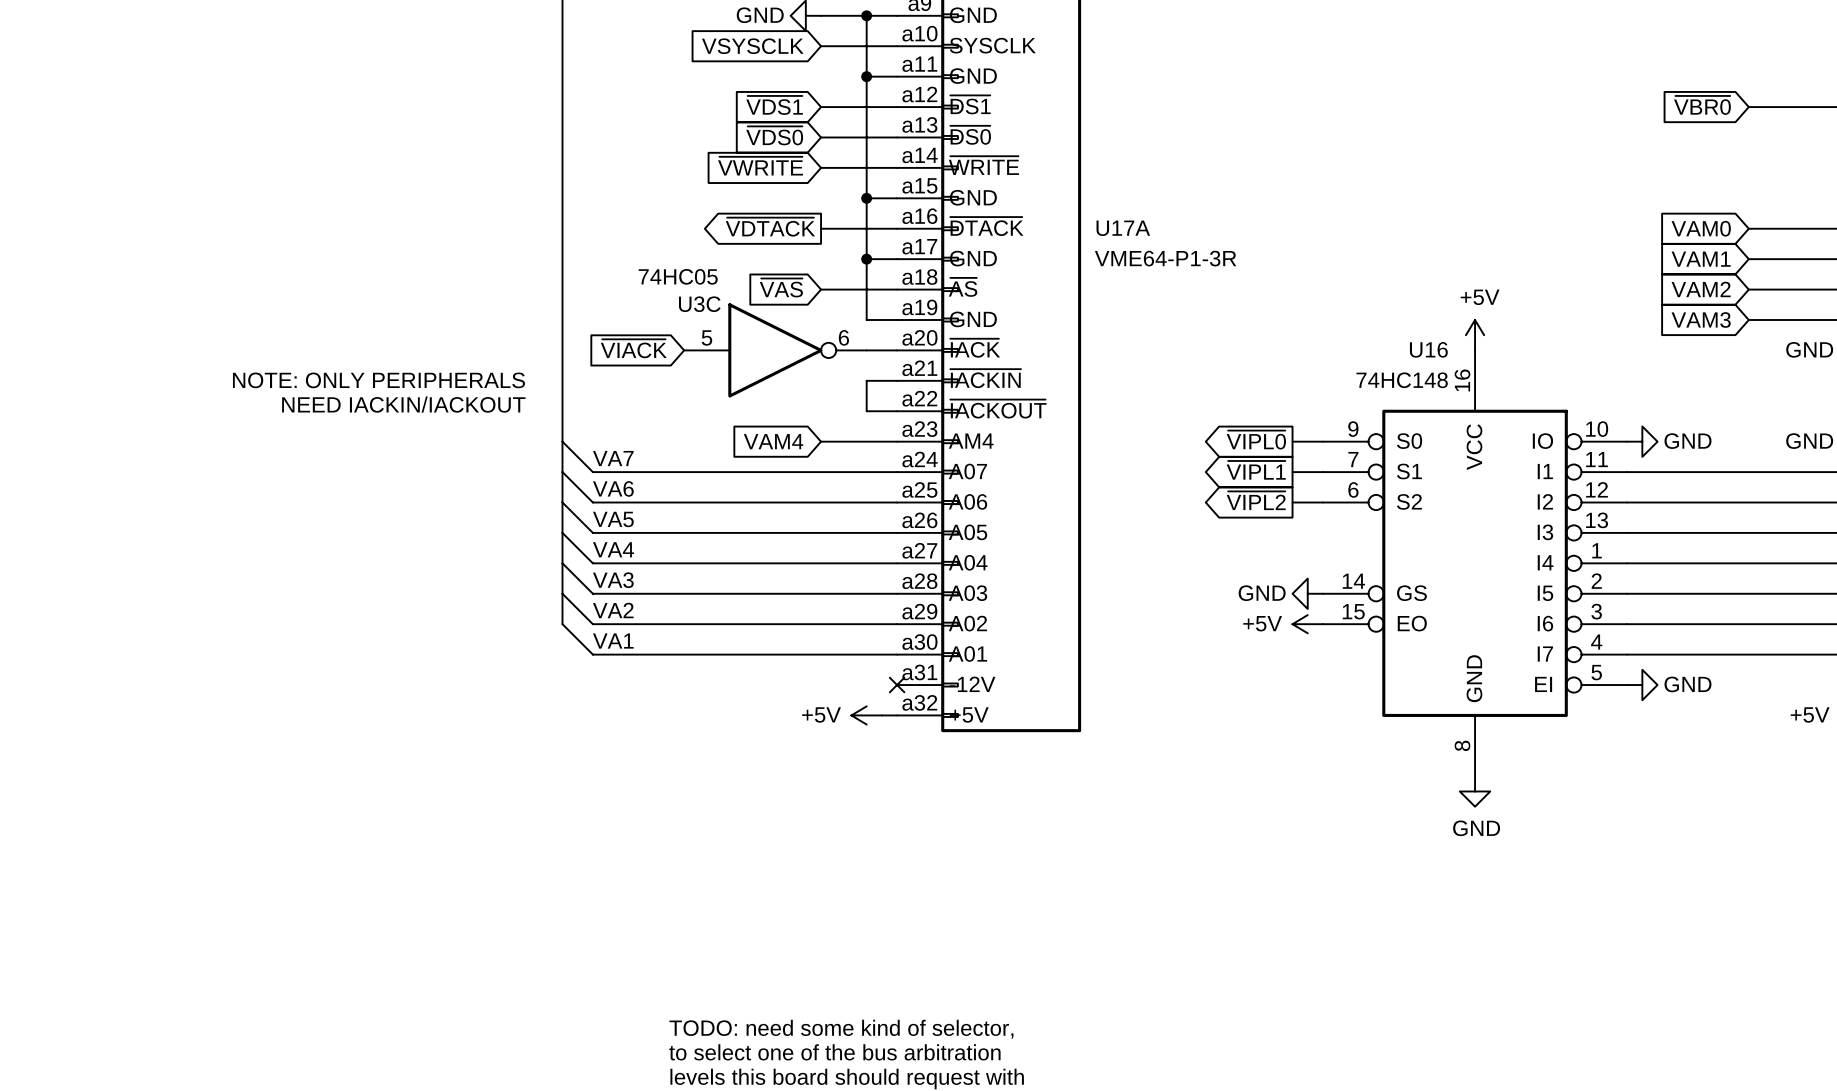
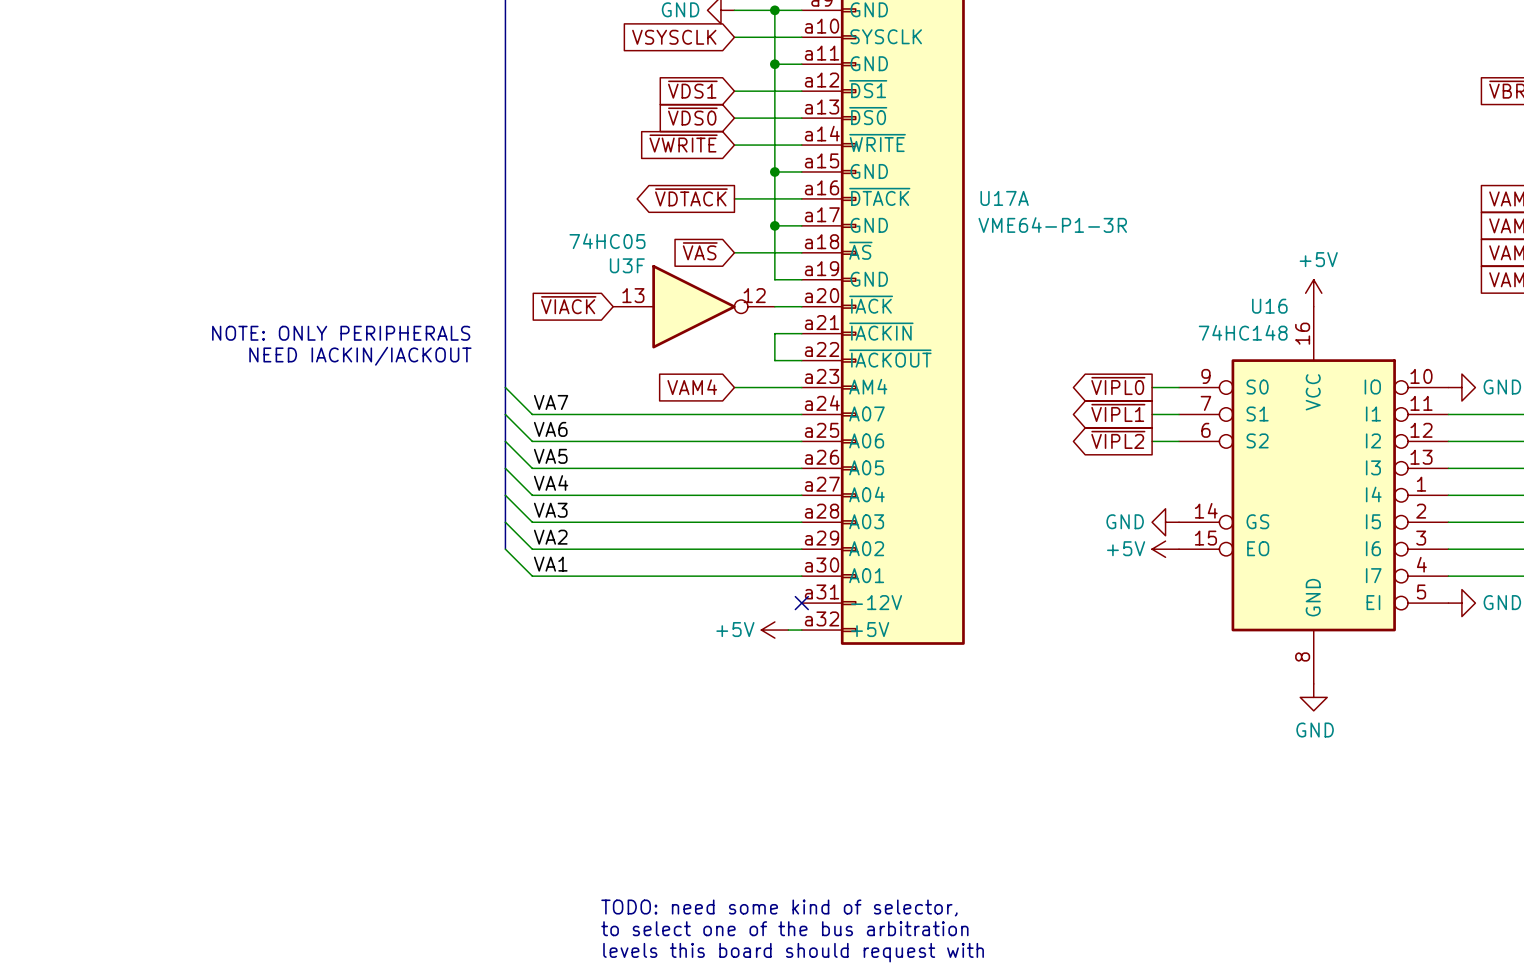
U3C name: U3C (699, 304) -> U3F (627, 265)
U3C pin number: 5 (706, 337) -> 13 (633, 295)
U3C pin number: 6 (843, 337) -> 12 (754, 295)

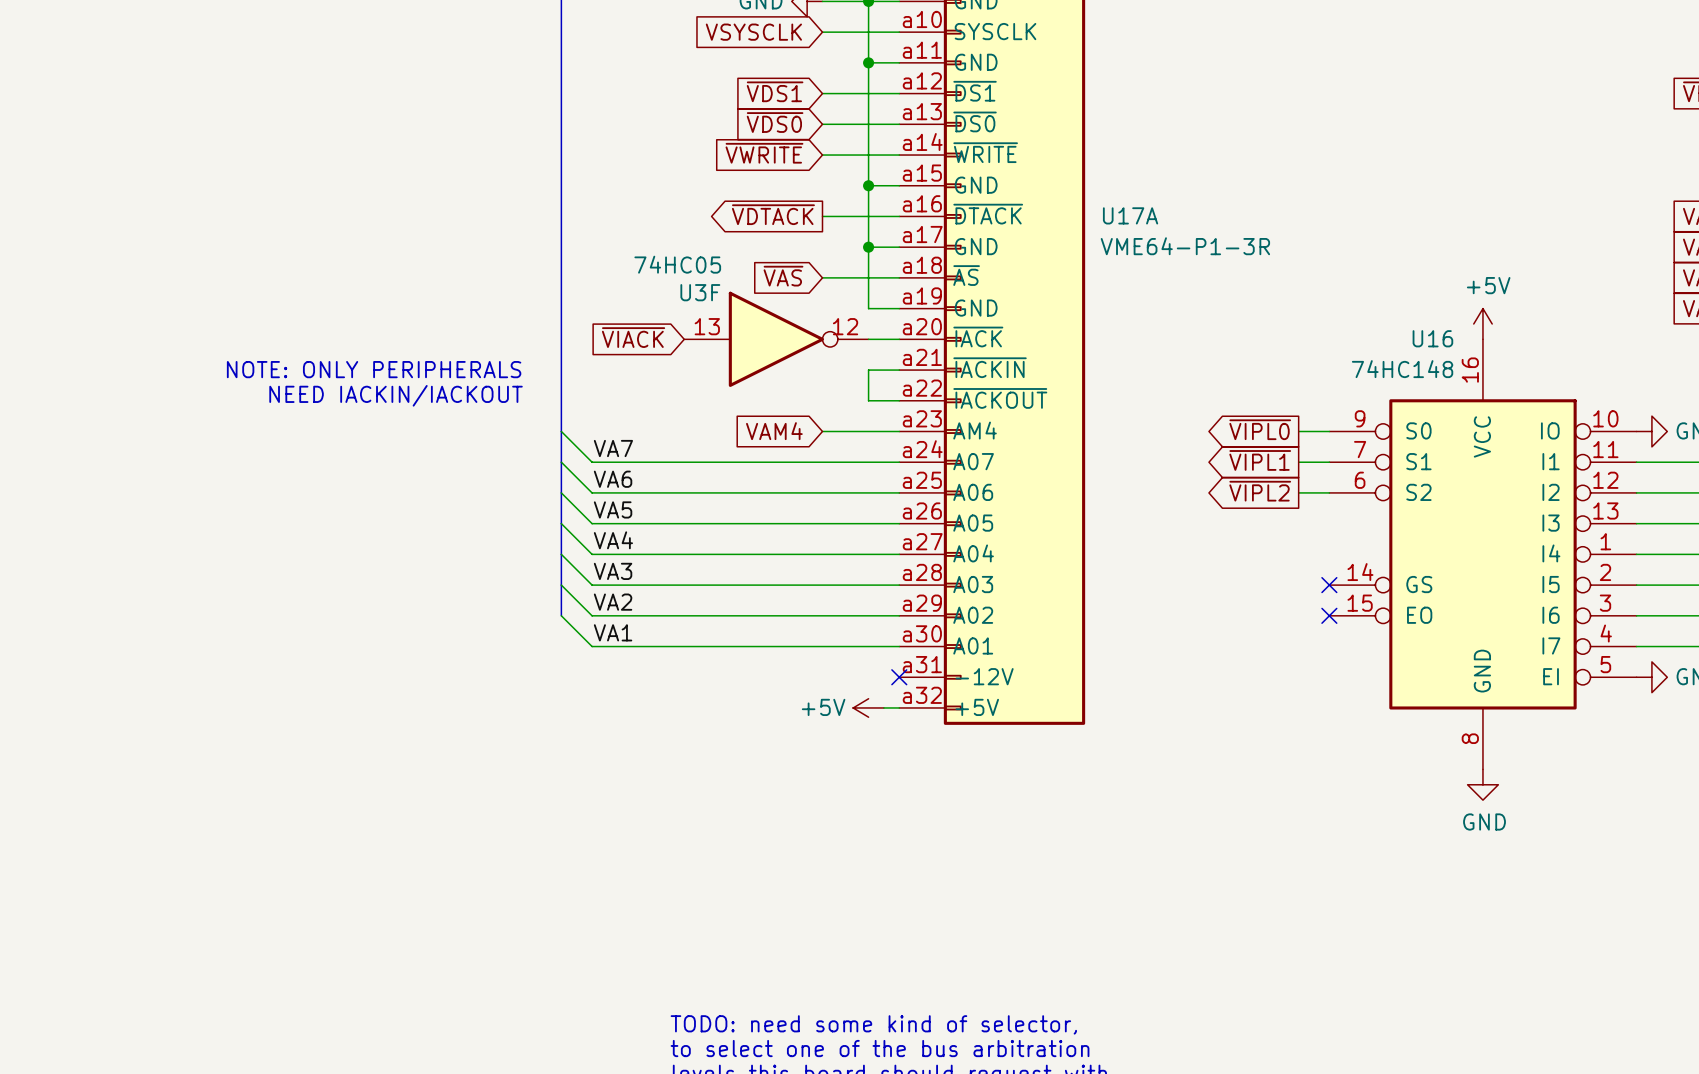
power symbol: GND (1165, 522) -> none
no-connect mark: none -> (1329, 585)
power symbol: +5V (1165, 549) -> none
no-connect mark: none -> (1329, 615)

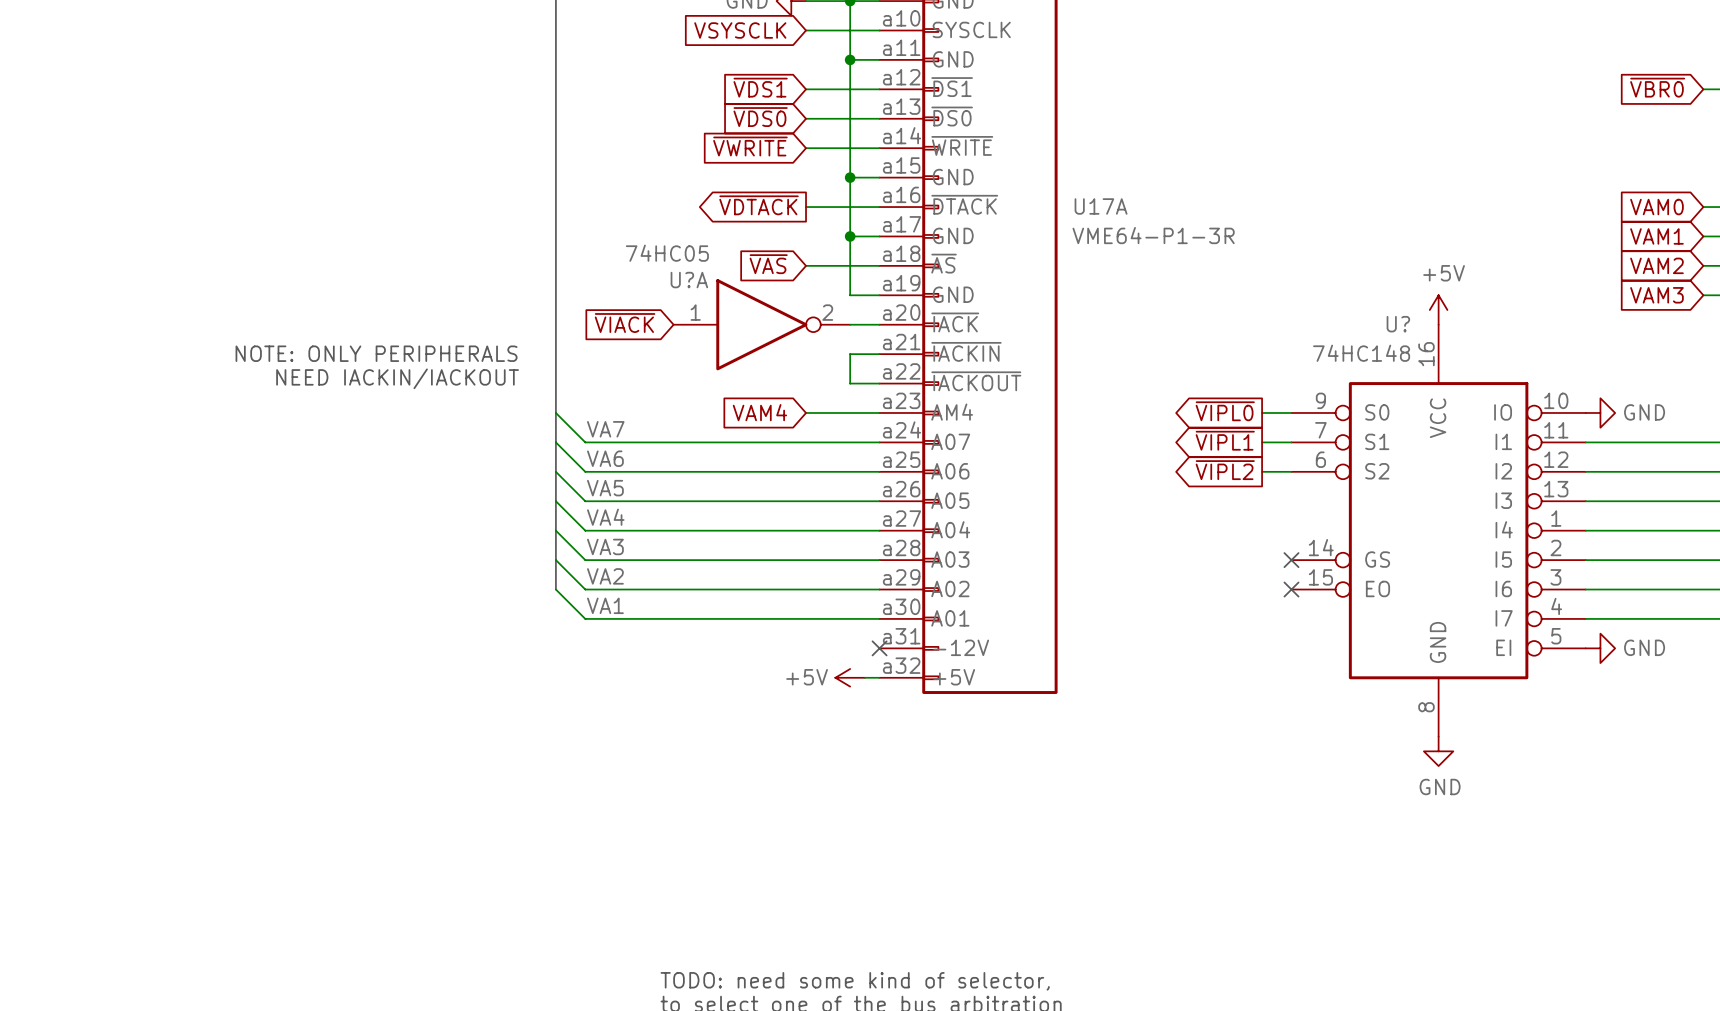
U3F name: U3F (700, 292) -> U?A (689, 280)
U3F pin number: 13 (707, 326) -> 1 (695, 312)
U3F pin number: 12 (845, 326) -> 2 (827, 312)
U16 name: U16 (1432, 338) -> U? (1398, 324)

